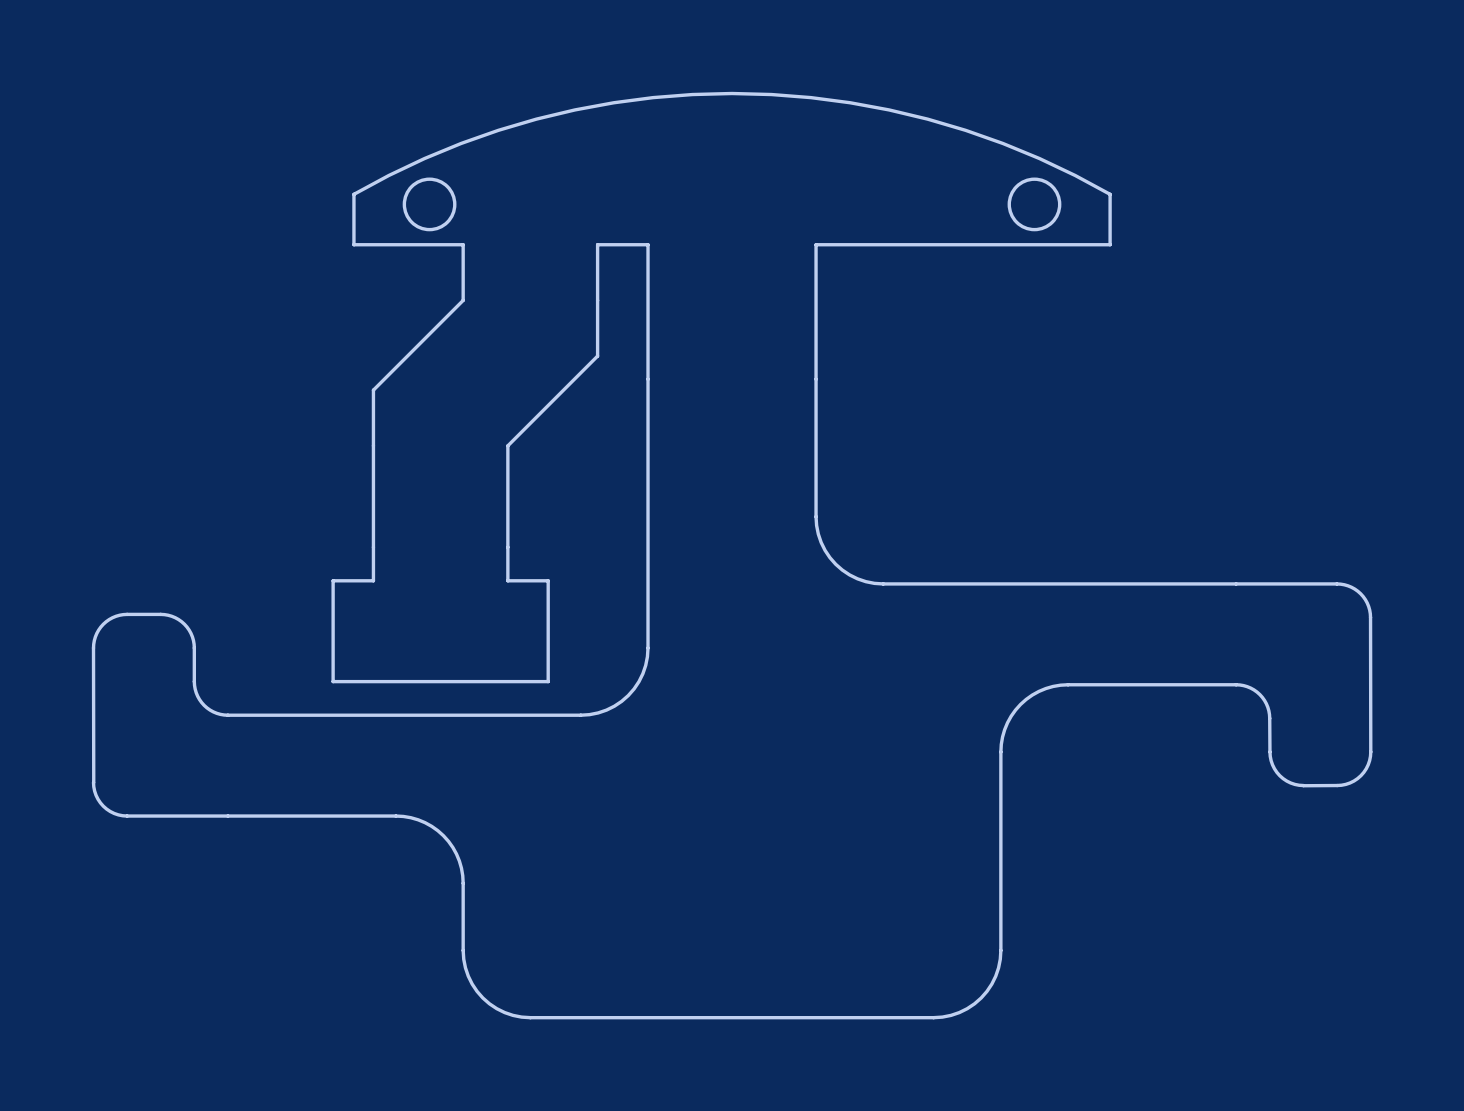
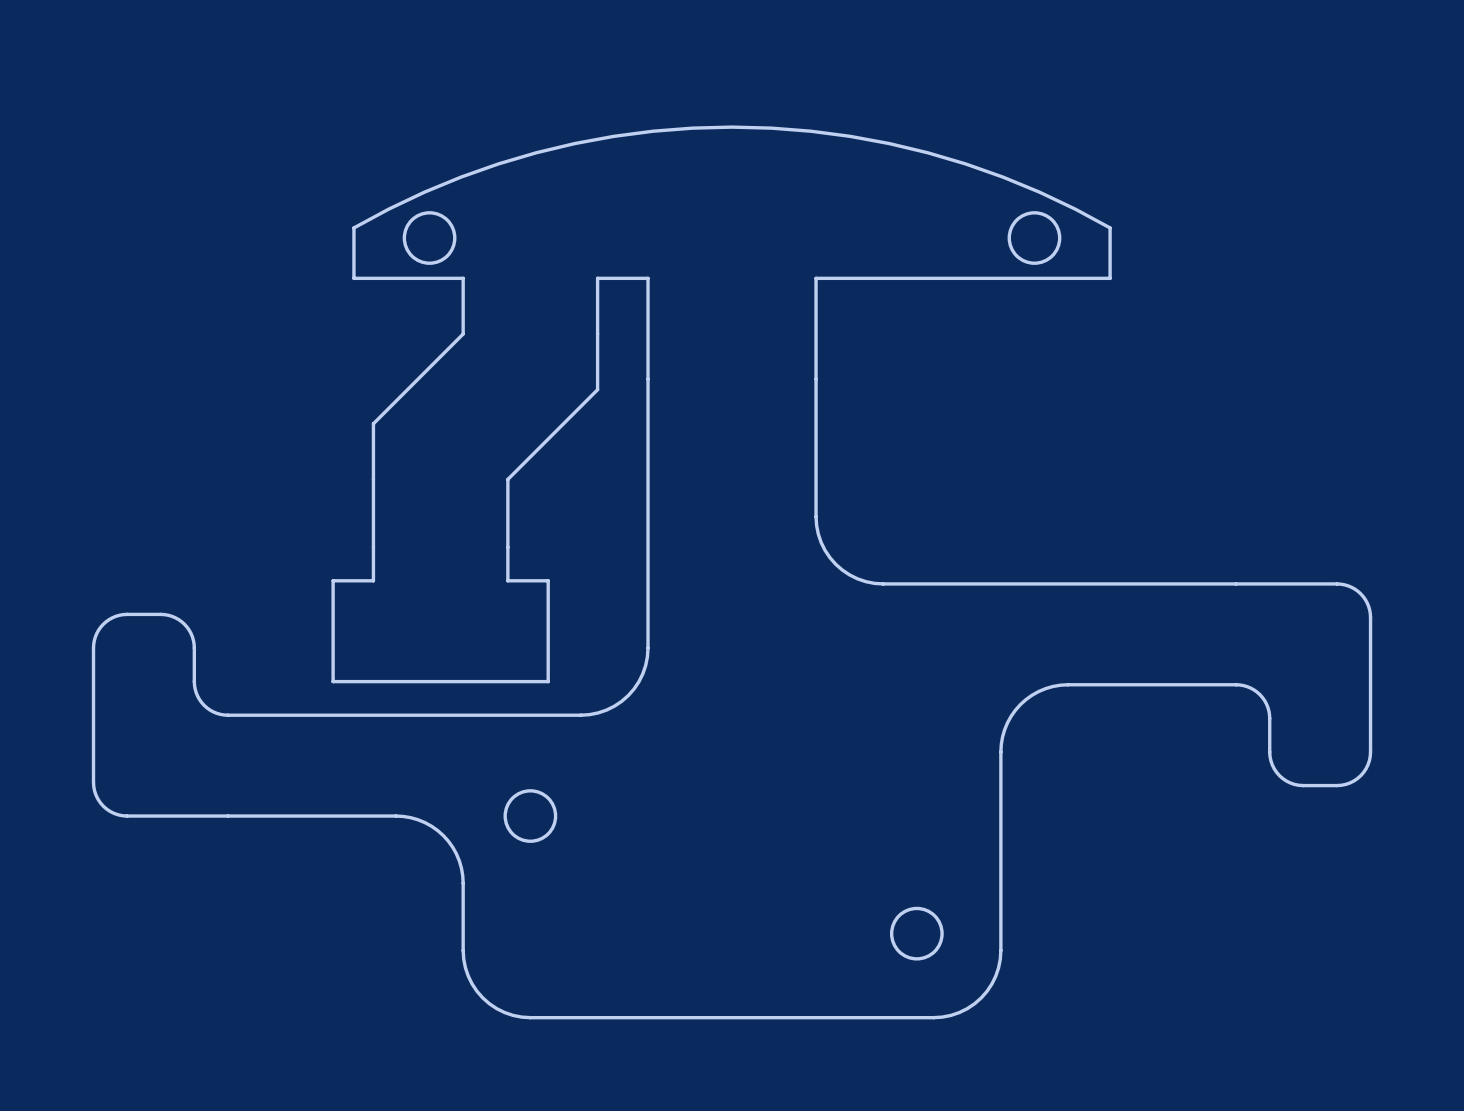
drawing shape: [91, 91, 1373, 1020] -> [91, 125, 1373, 1020]
round board edge: none -> [503, 789, 558, 843]
round board edge: none -> [889, 906, 944, 961]

